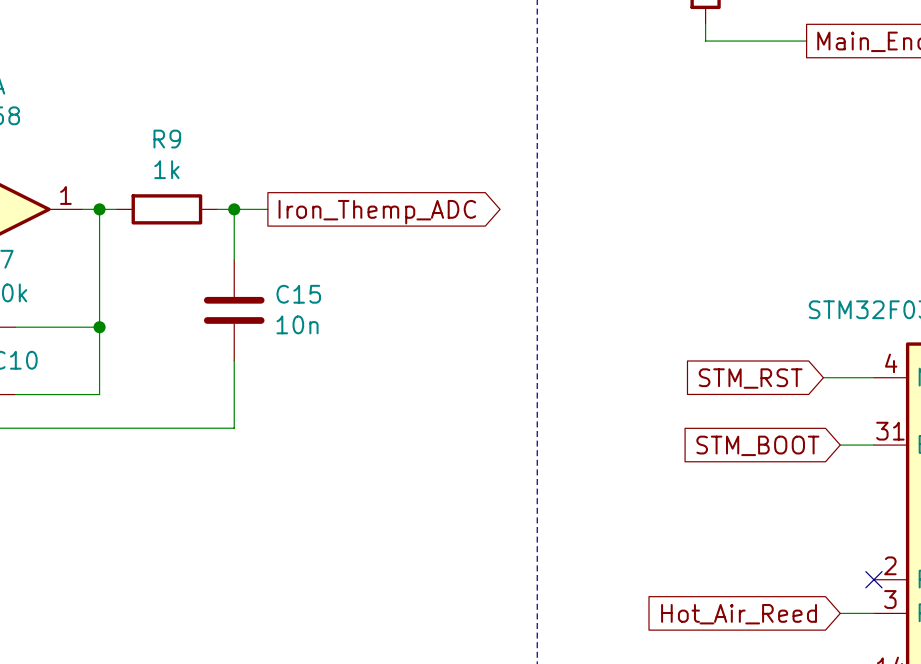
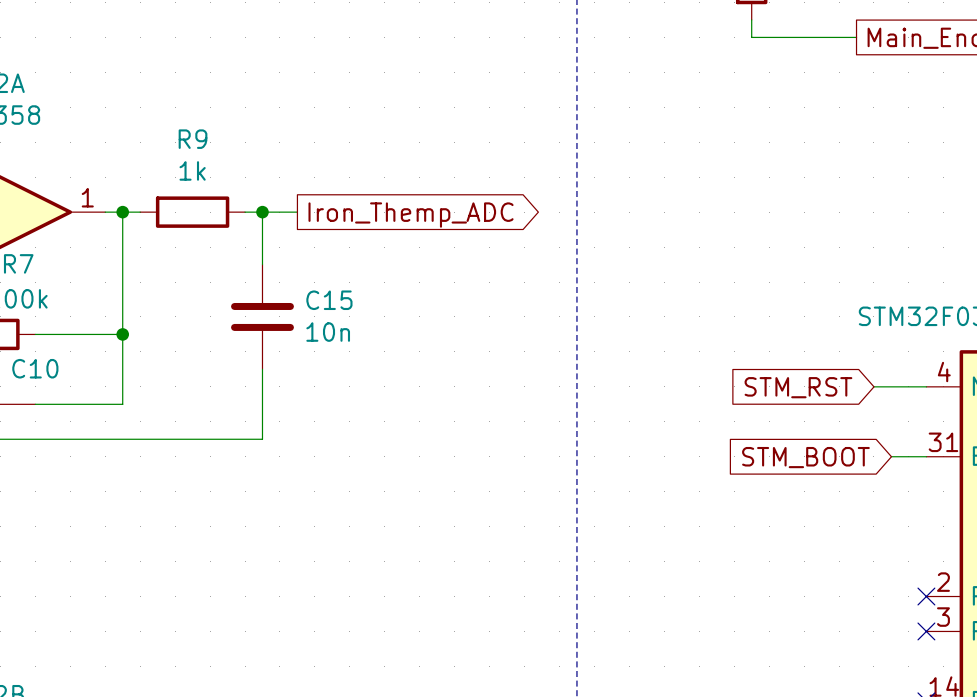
wire: (840, 613) (873, 613) -> none
no-connect mark: none -> (926, 631)
global label: Hot_Air_Reed (739, 614) -> none

